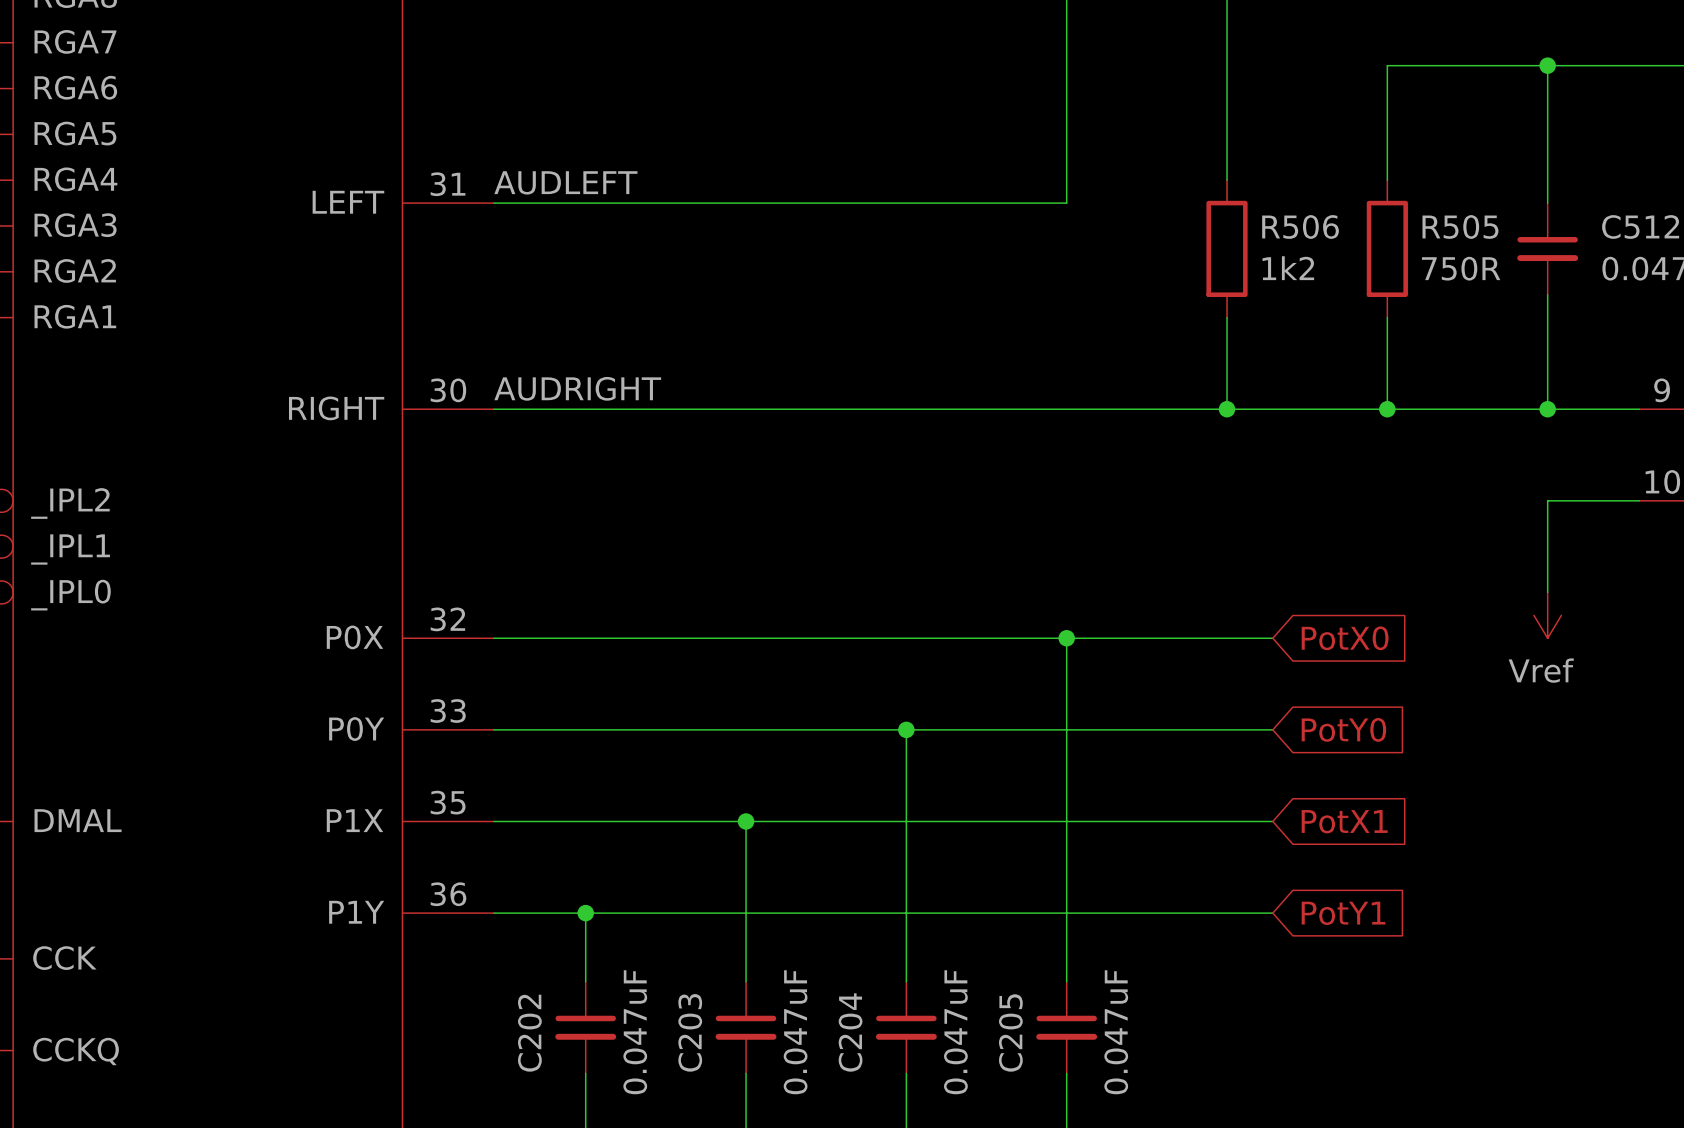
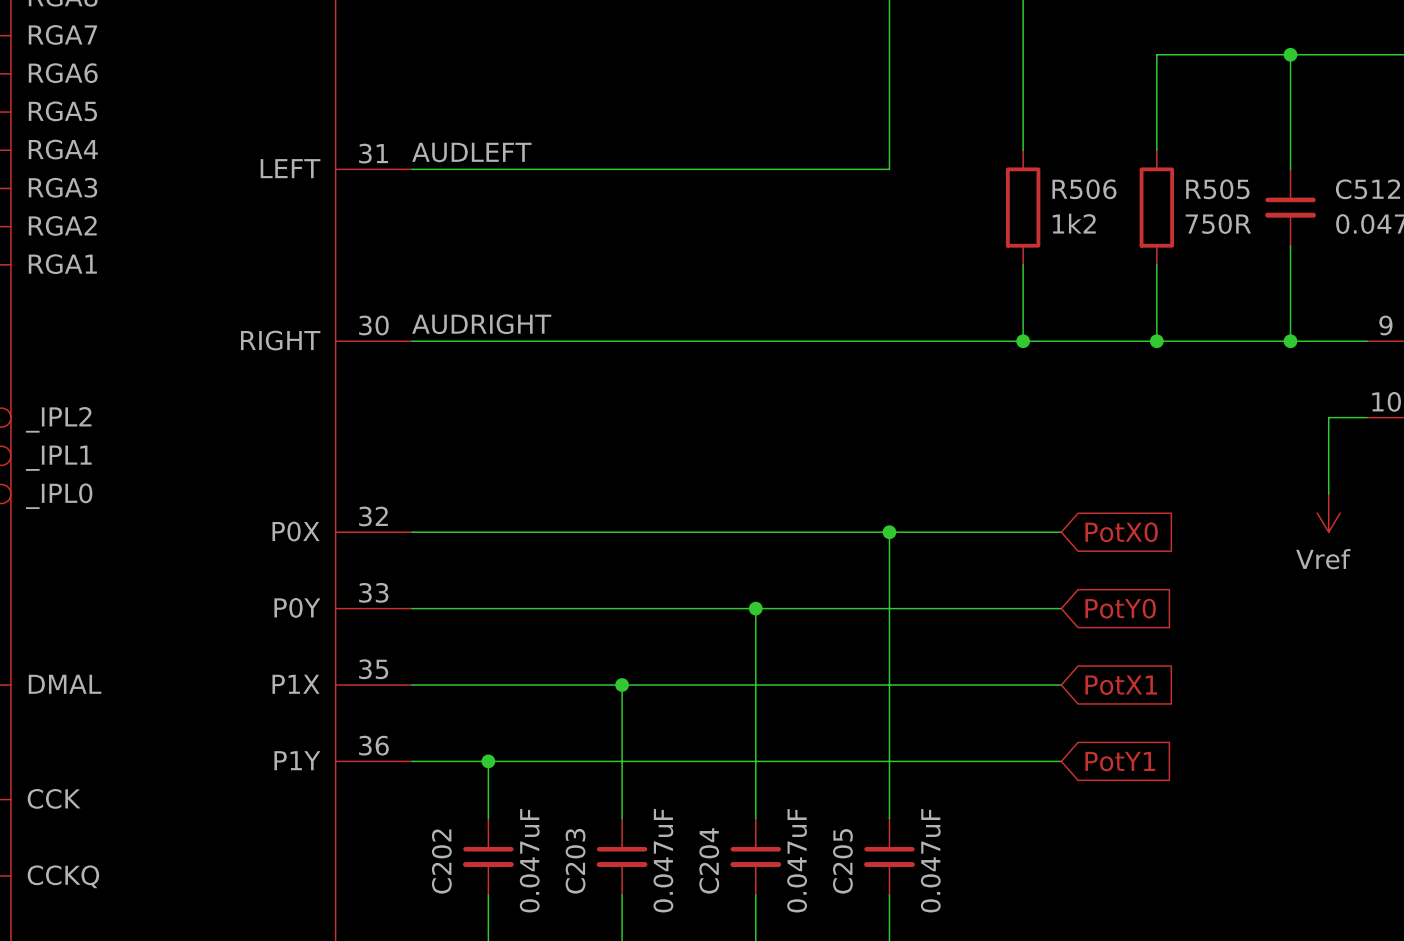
wire: (1593, 500) (1547, 500) (1547, 592) -> (1328, 417) (1328, 494)
power symbol position: Vref (1547, 615) -> Vref (1328, 513)

